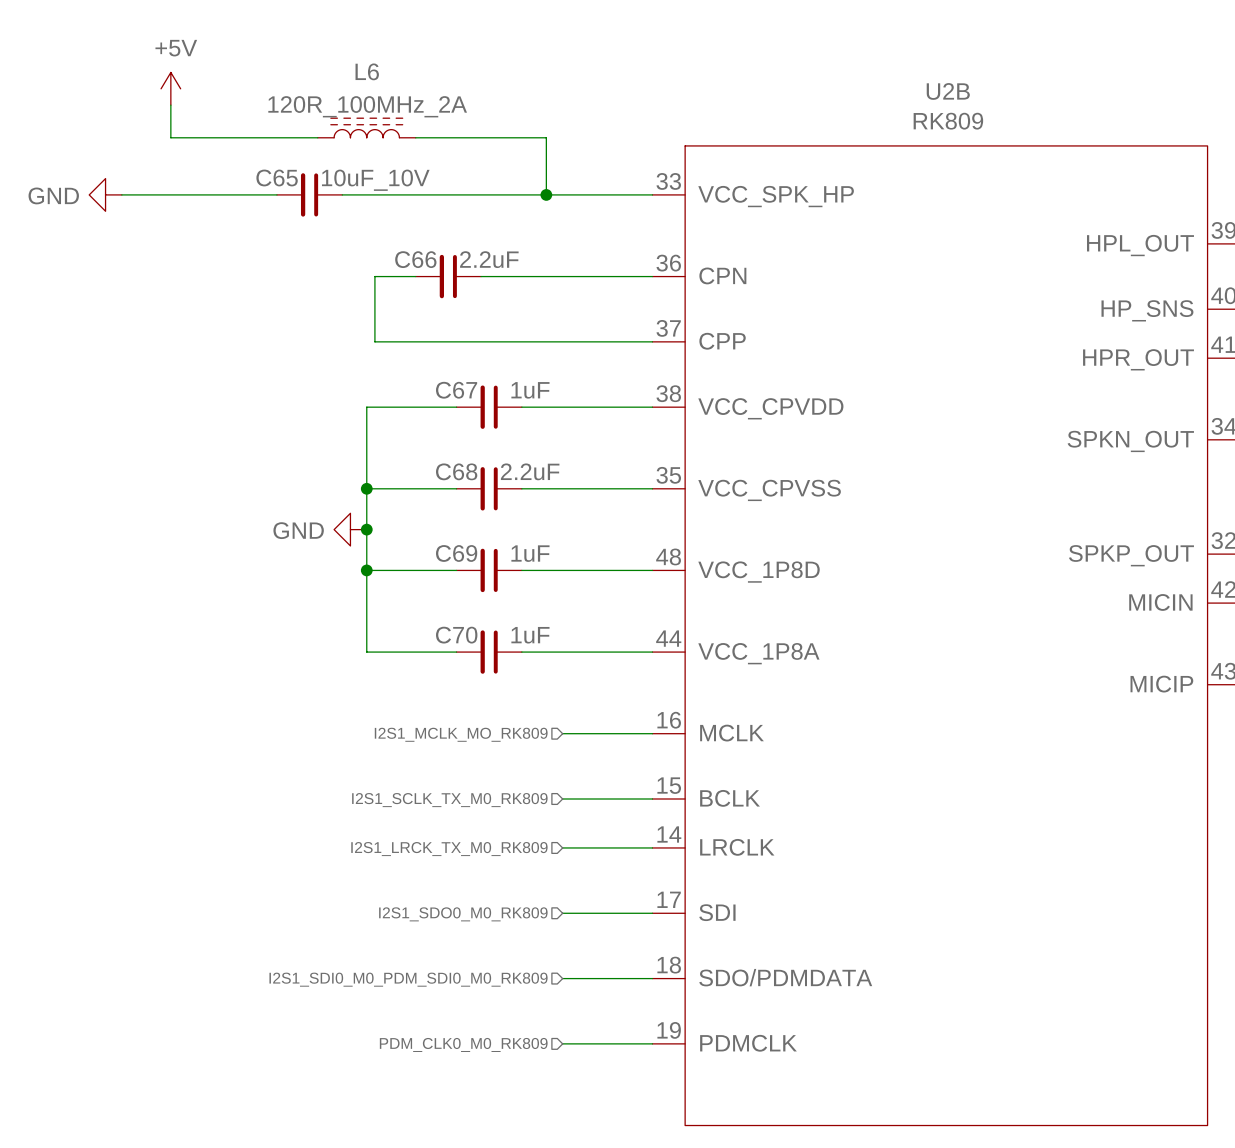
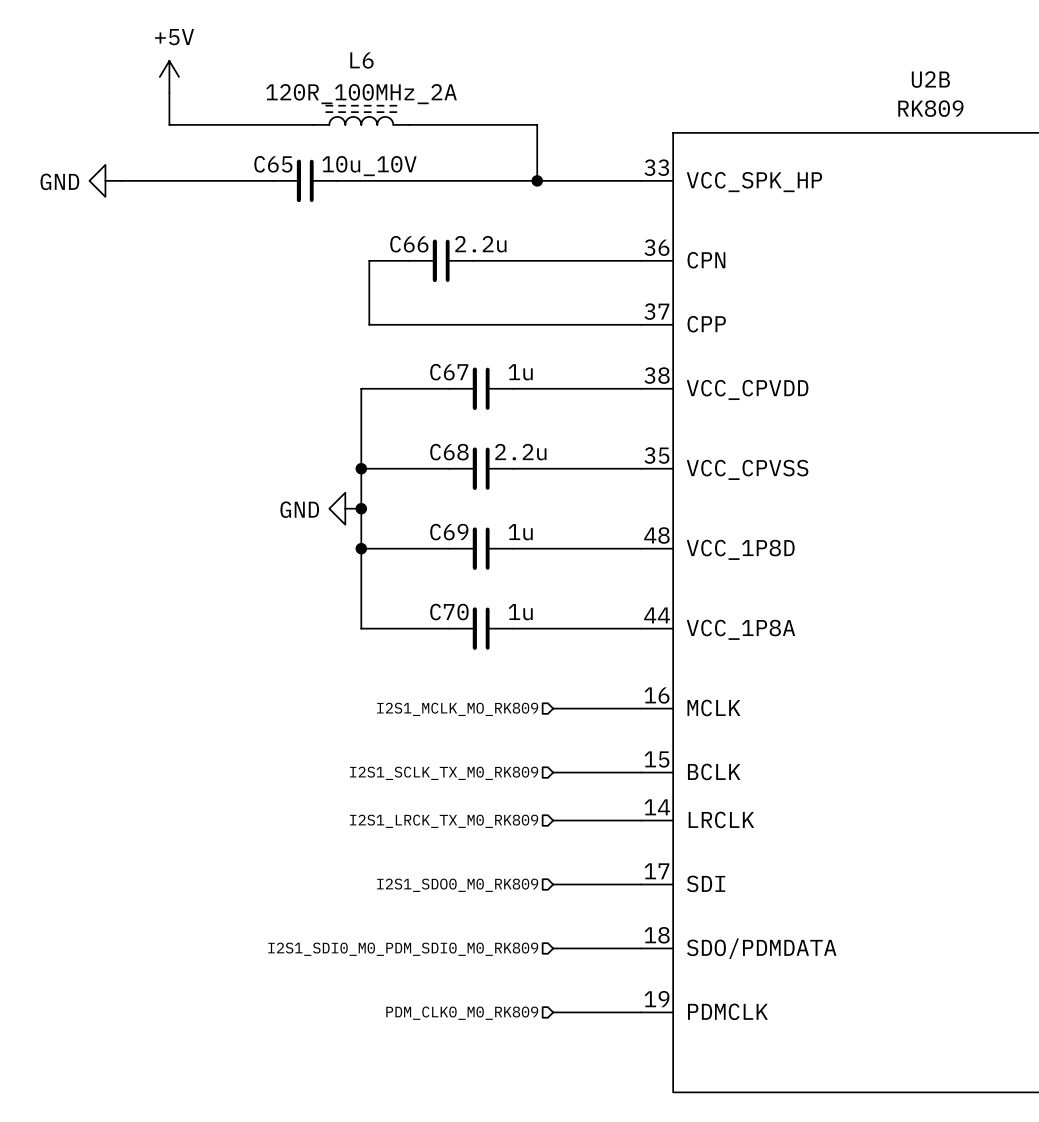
C65 value: 10uF_10V (375, 180) -> 10u_10V (369, 166)
C66 value: 2.2uF (489, 259) -> 2.2u (480, 244)
C67 value: 1uF (530, 390) -> 1u (520, 372)
C68 value: 2.2uF (530, 471) -> 2.2u (520, 452)
C69 value: 1uF (530, 553) -> 1u (520, 532)
C70 value: 1uF (530, 635) -> 1u (520, 612)

